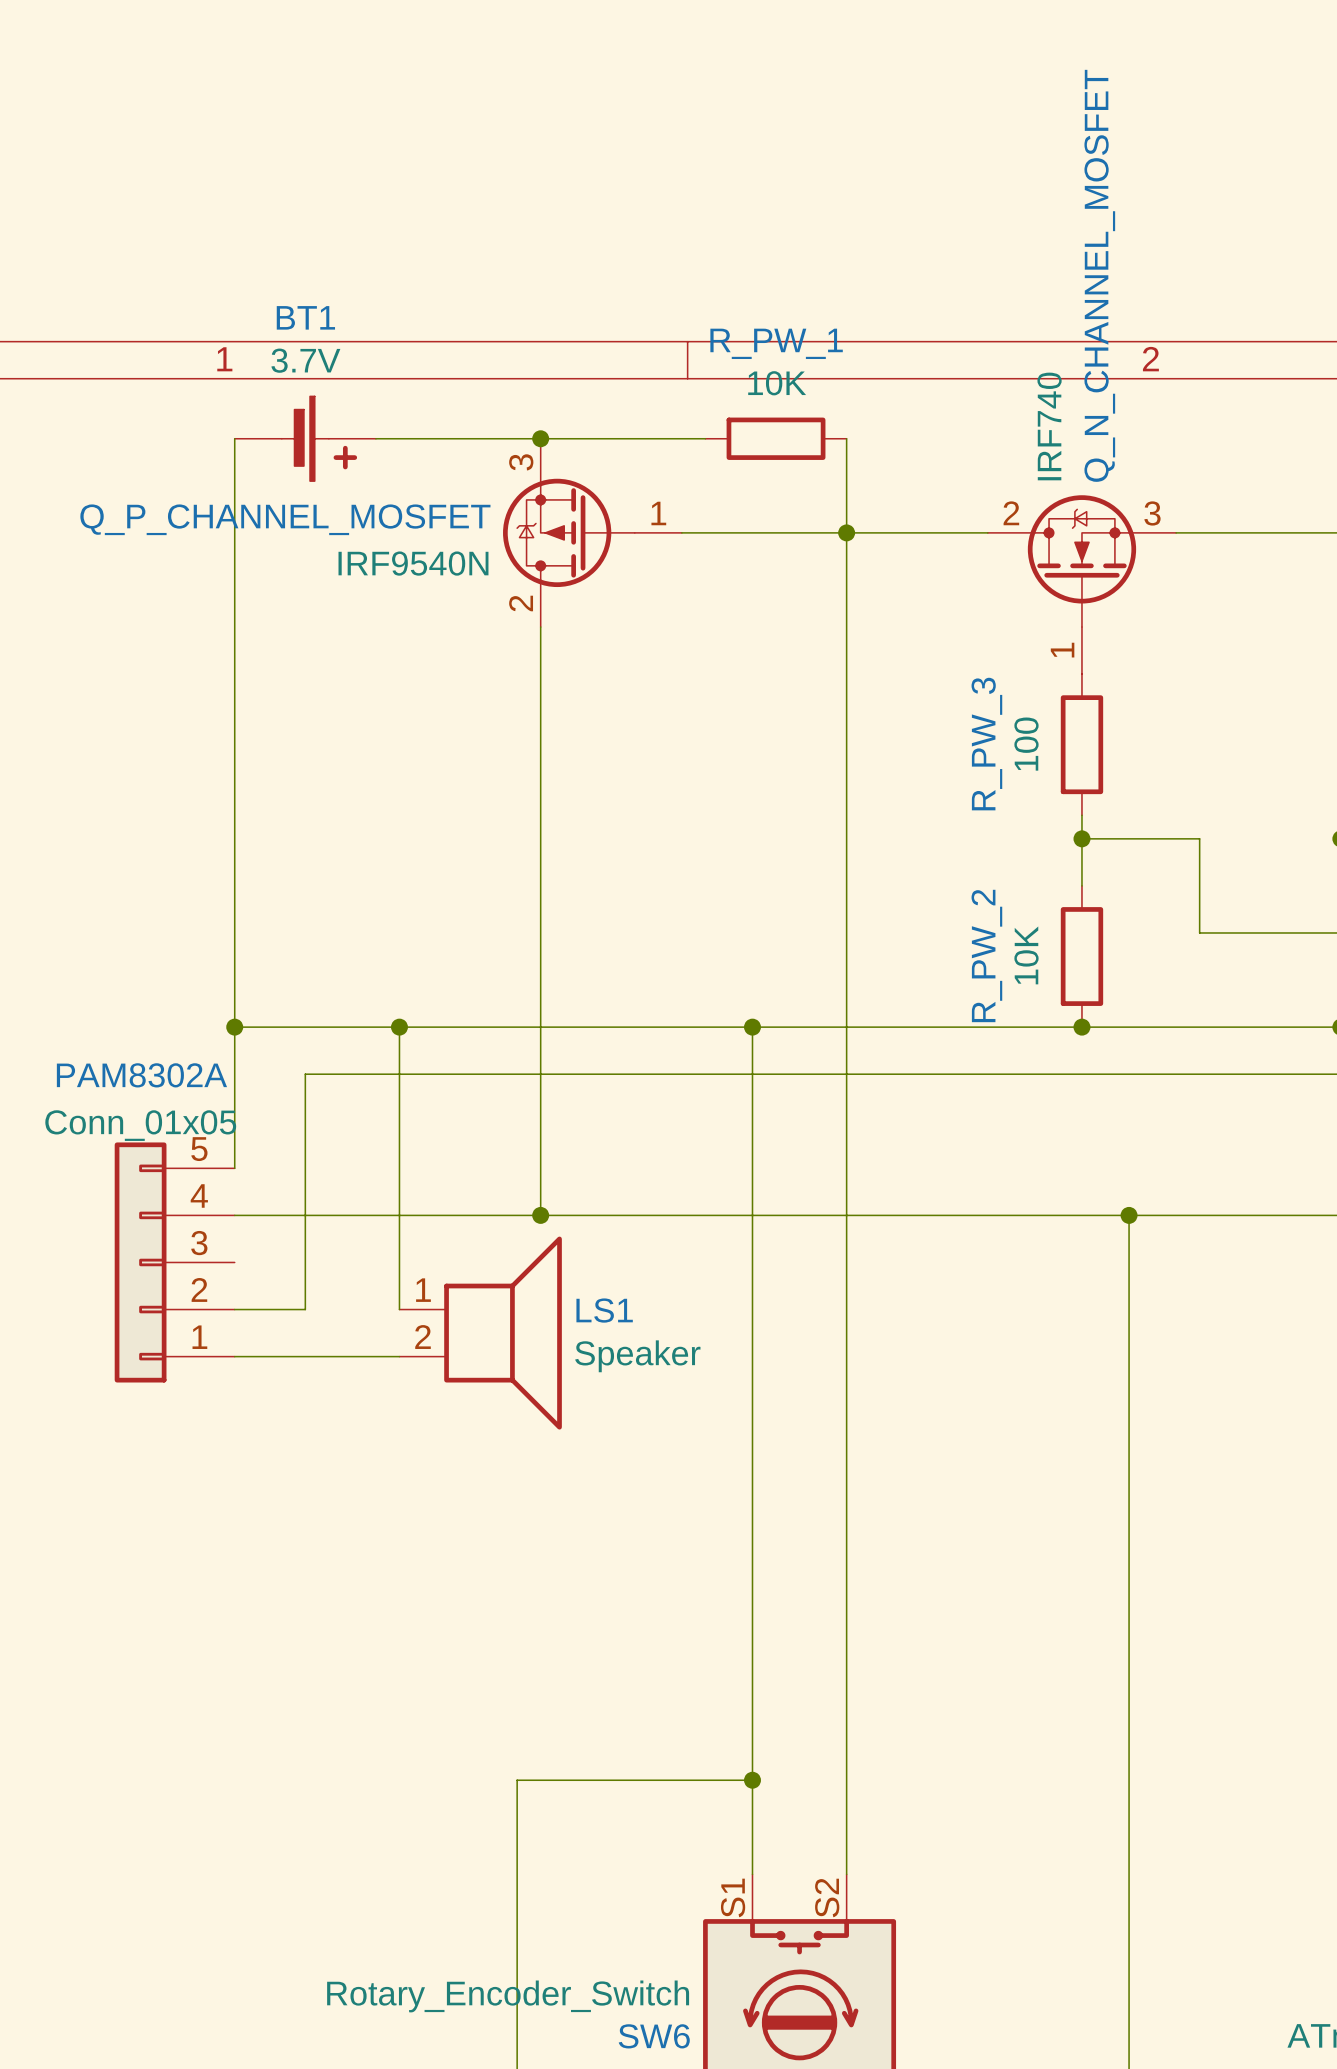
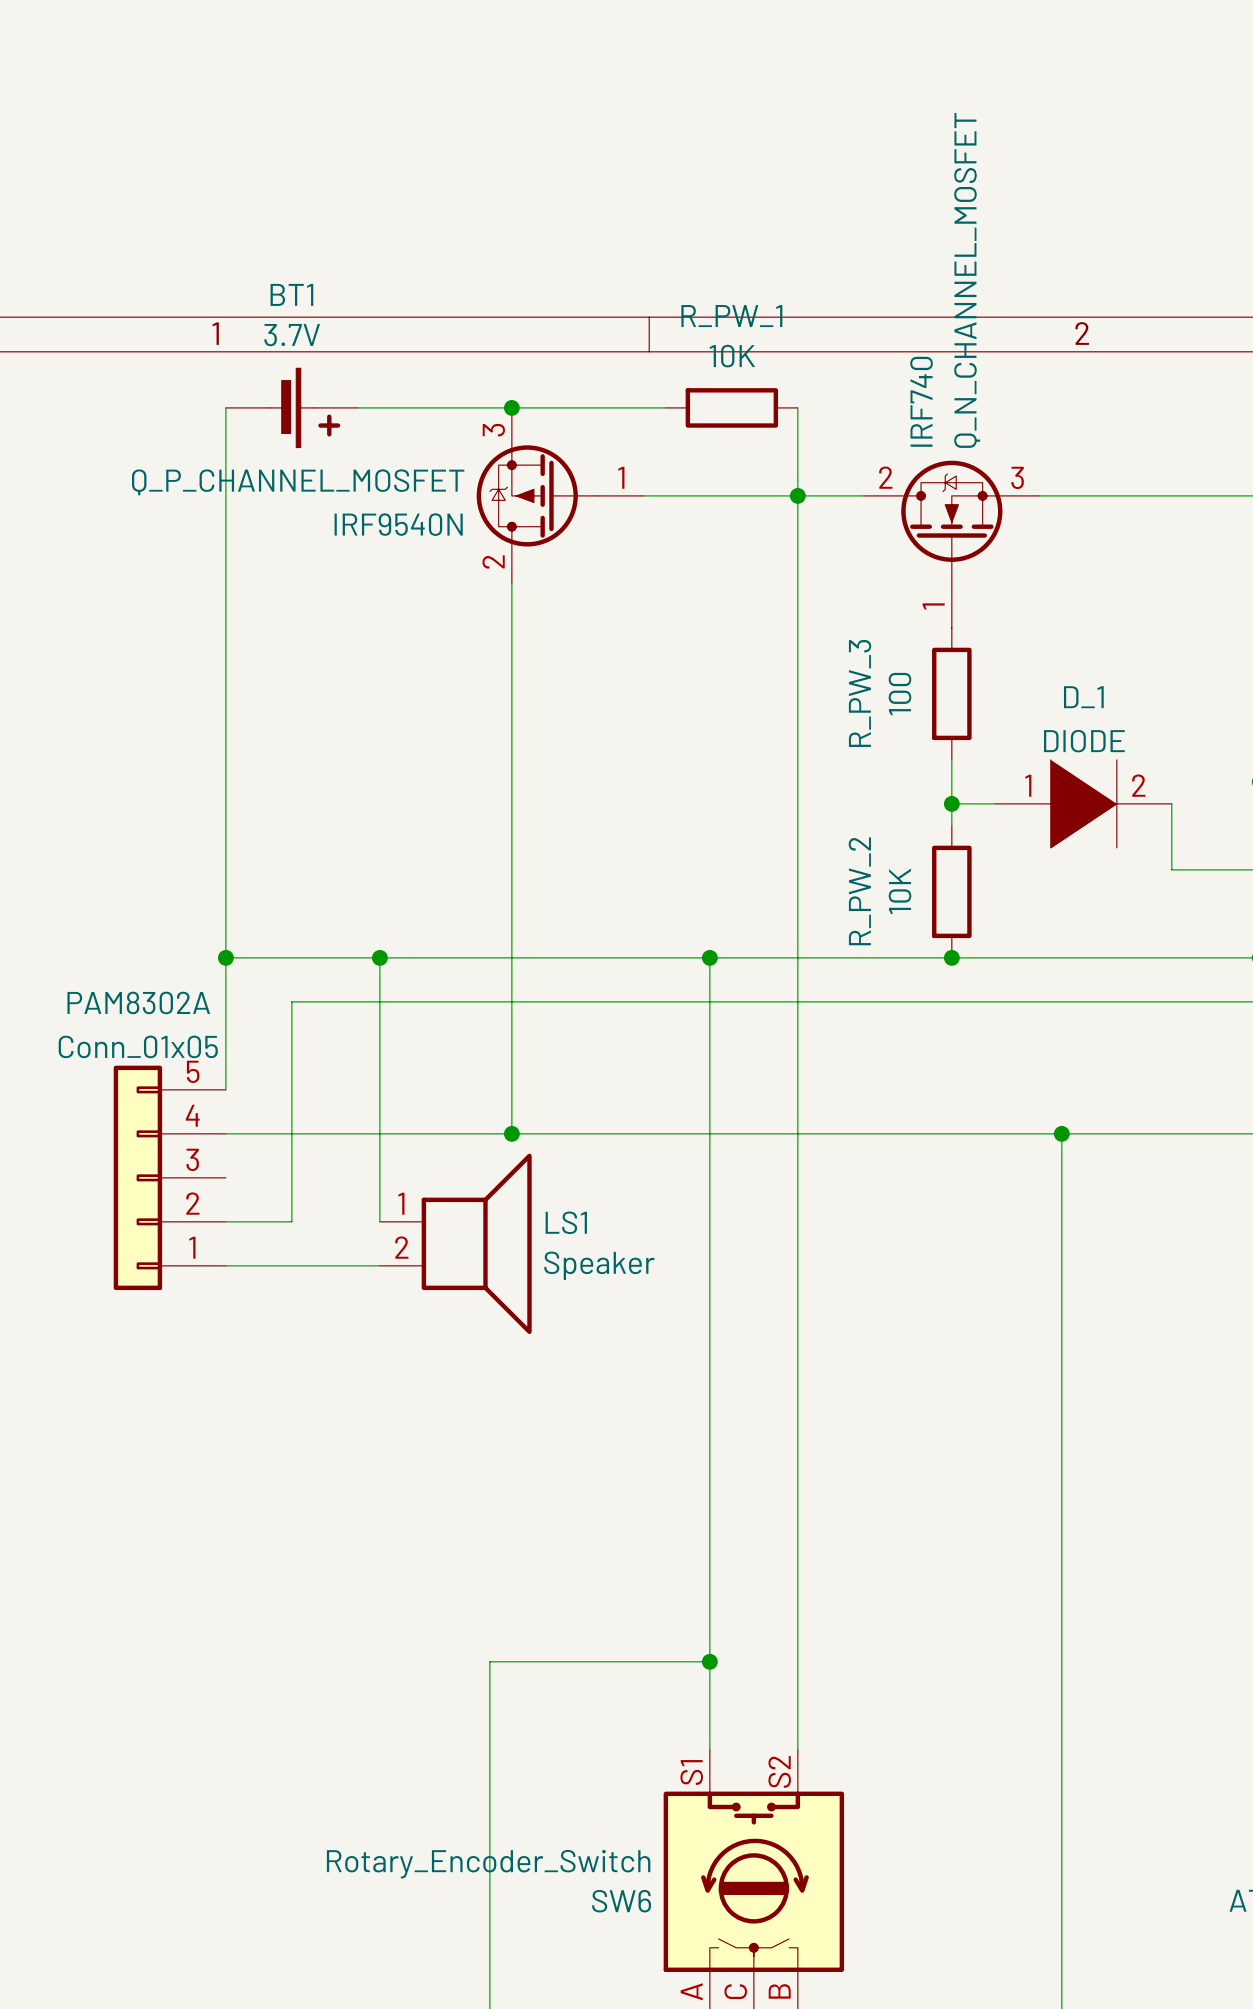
Q_N_CHANNEL_MOSFET position: (1081, 584) -> (951, 544)
R_PW_3 position: (1081, 744) -> (951, 693)
wire: (1081, 815) (1081, 885) -> (951, 759) (951, 825)
wire: (1081, 838) (1199, 838) (1199, 932) (1246, 932) -> (1171, 803) (1171, 869)
junction position: (1081, 838) -> (951, 803)
wire: none -> (951, 803) (995, 803)
D_1: none -> DIODE (1083, 803)
R_PW_2 position: (1081, 956) -> (951, 891)
junction position: (1081, 1027) -> (951, 957)

